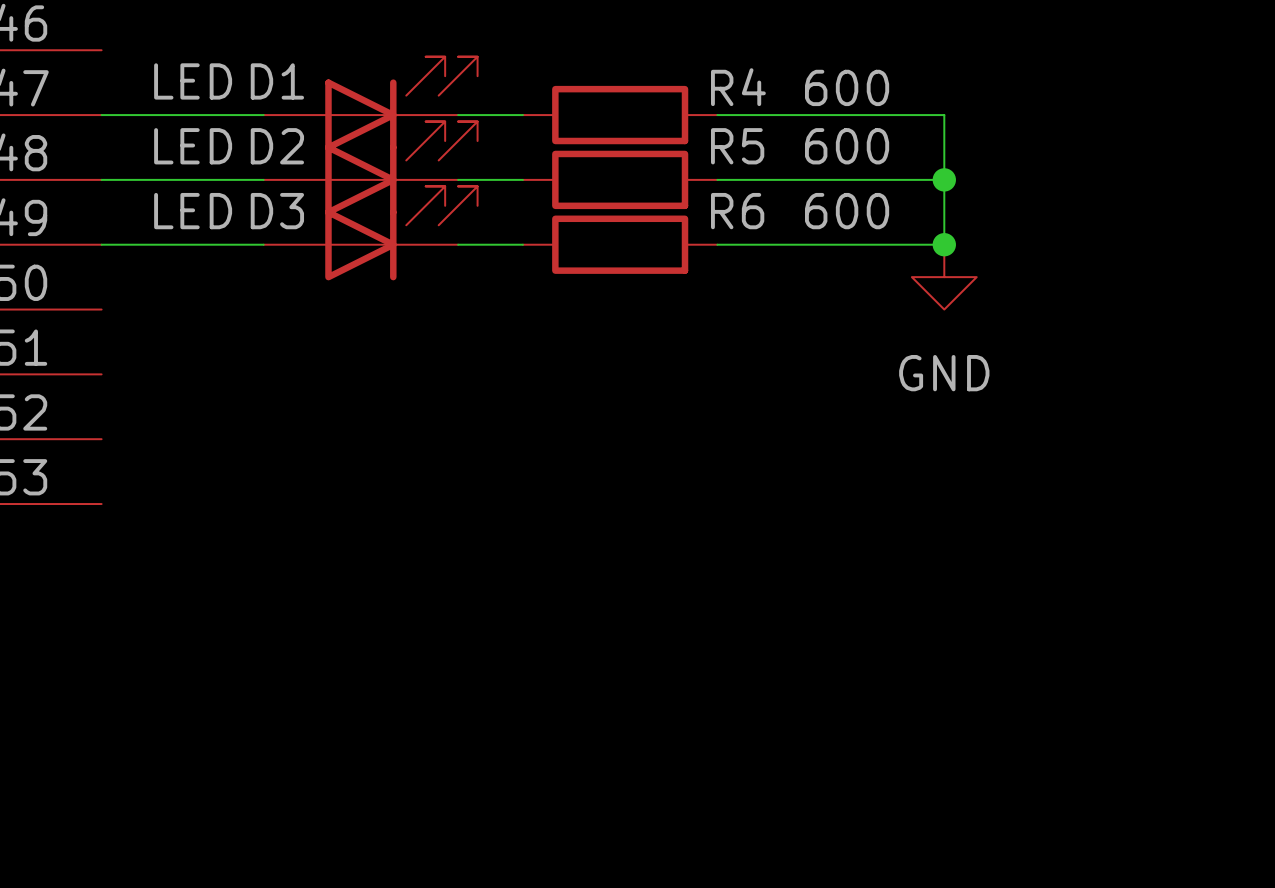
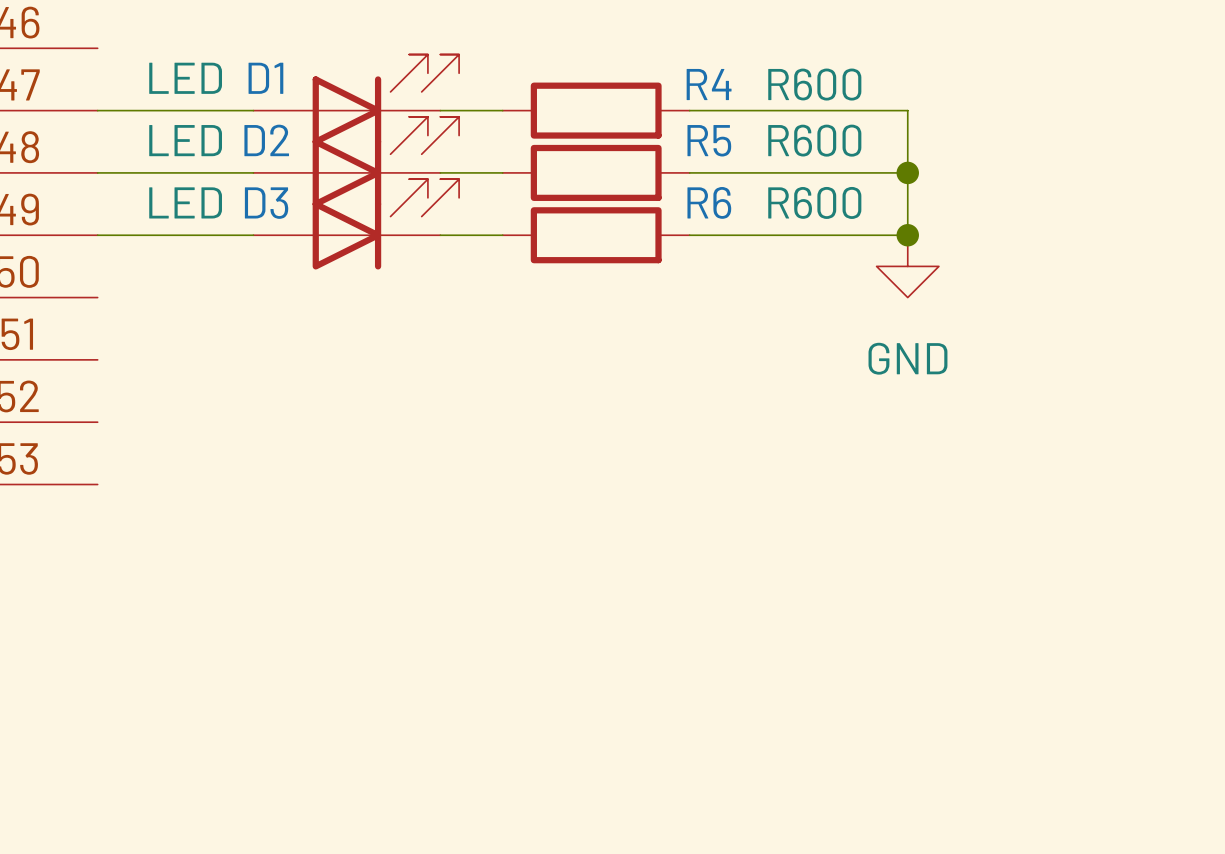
R4 value: 600 (847, 87) -> R600 (814, 84)
R6 value: 600 (847, 146) -> R600 (814, 140)
R5 value: 600 (847, 211) -> R600 (814, 202)

